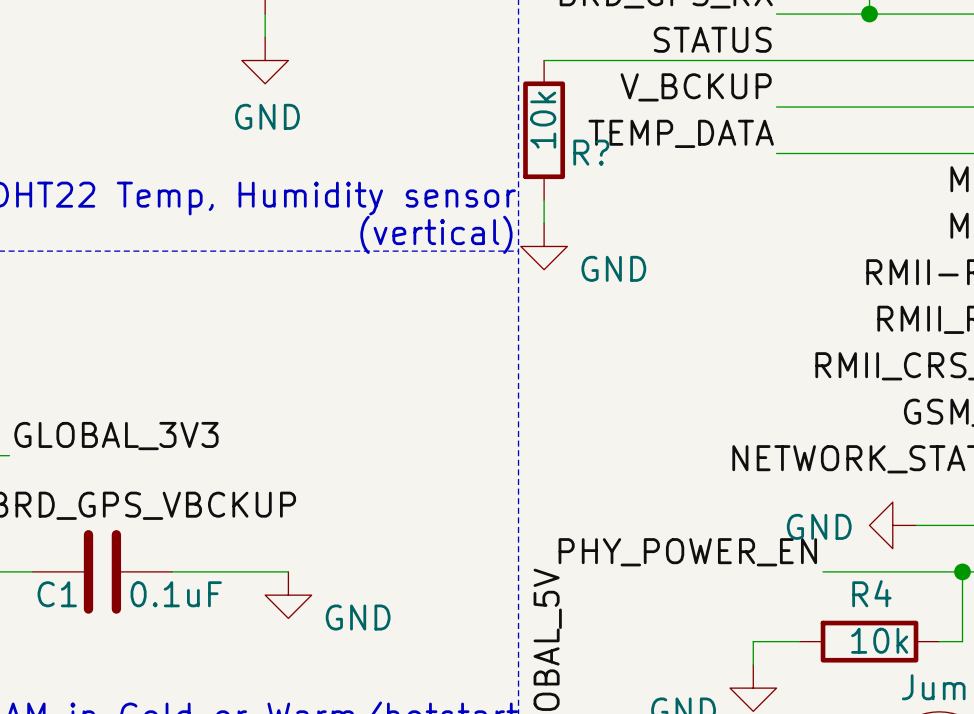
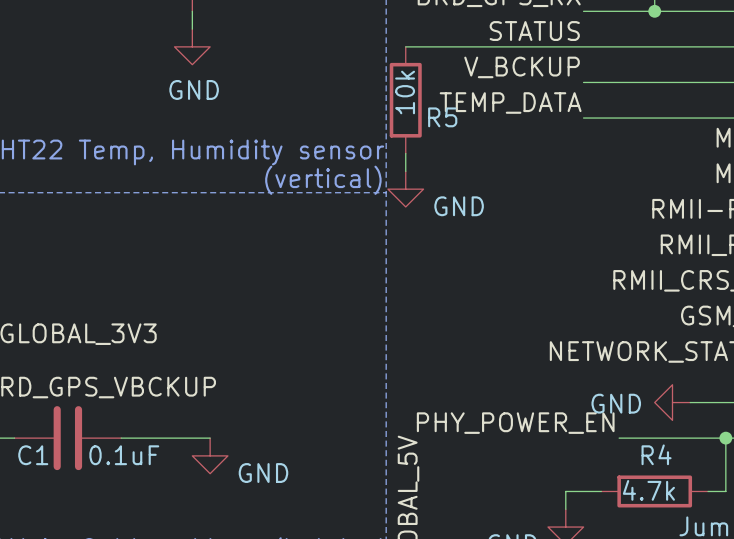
R? name: R? (591, 152) -> R5 (442, 117)
R4 value: 10k (879, 640) -> 4.7k (648, 490)

